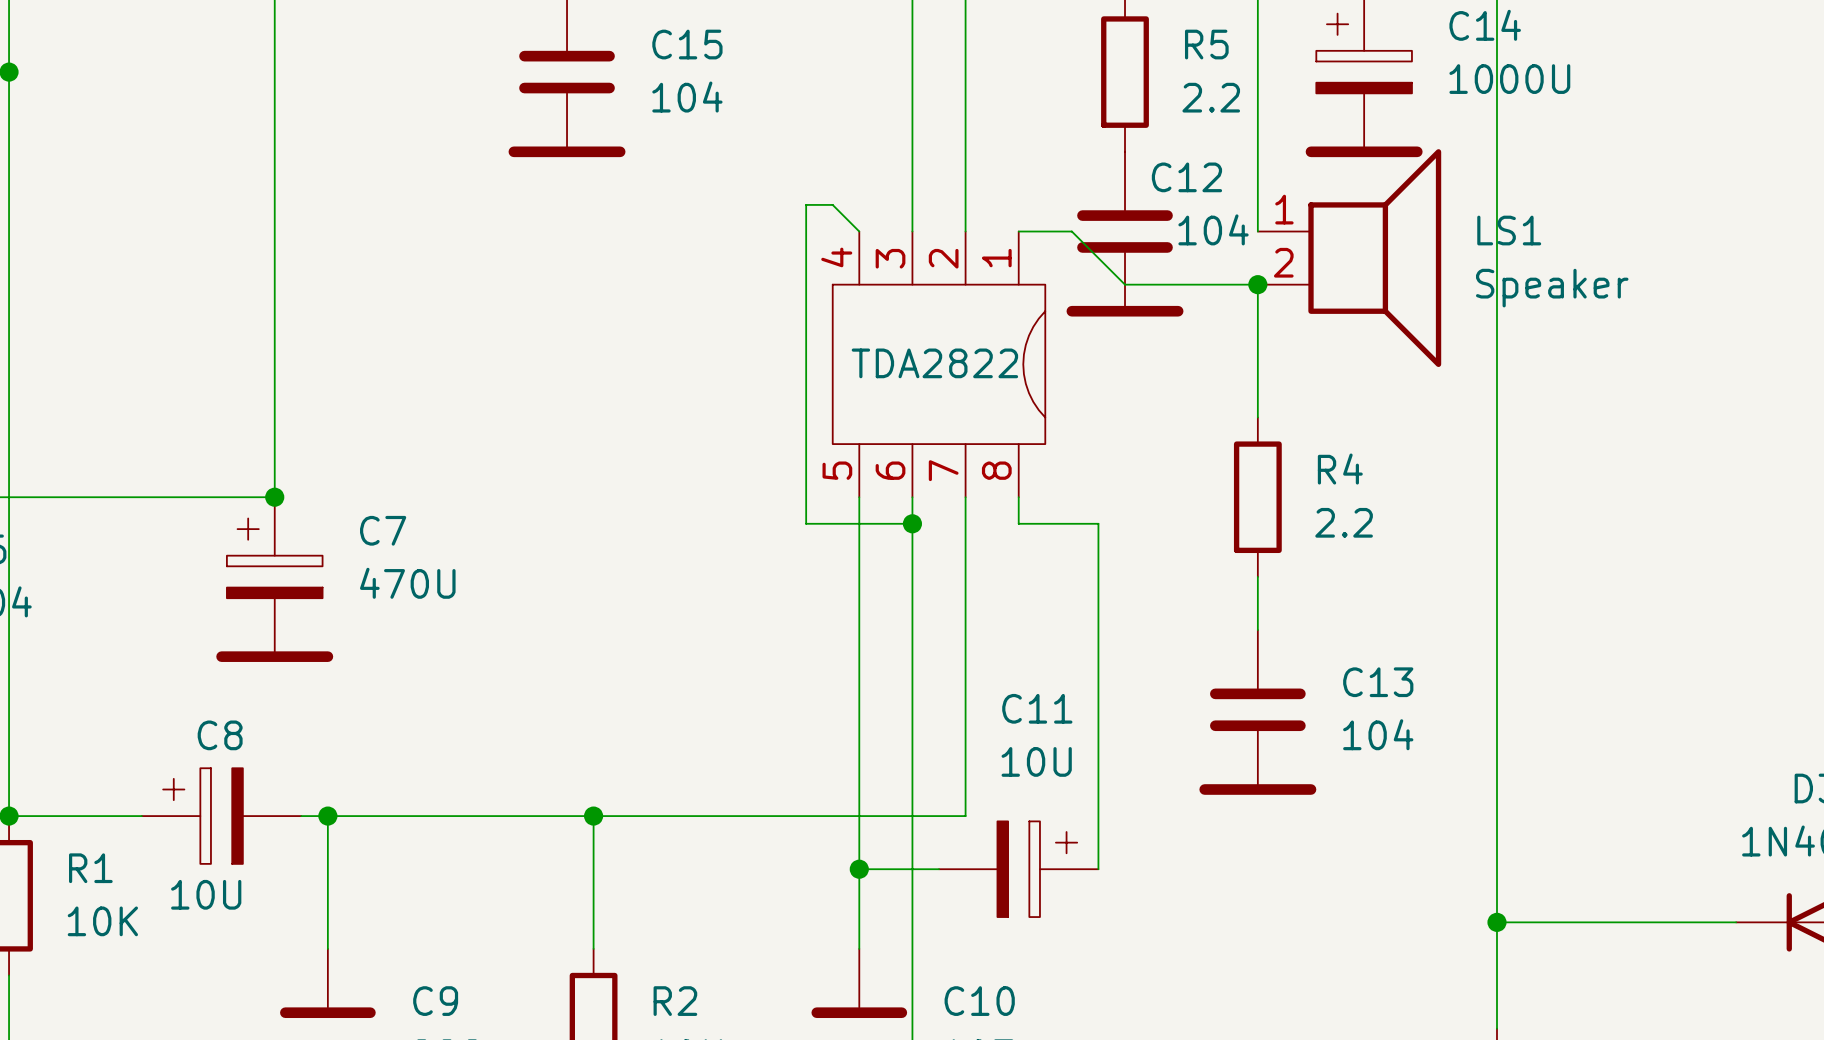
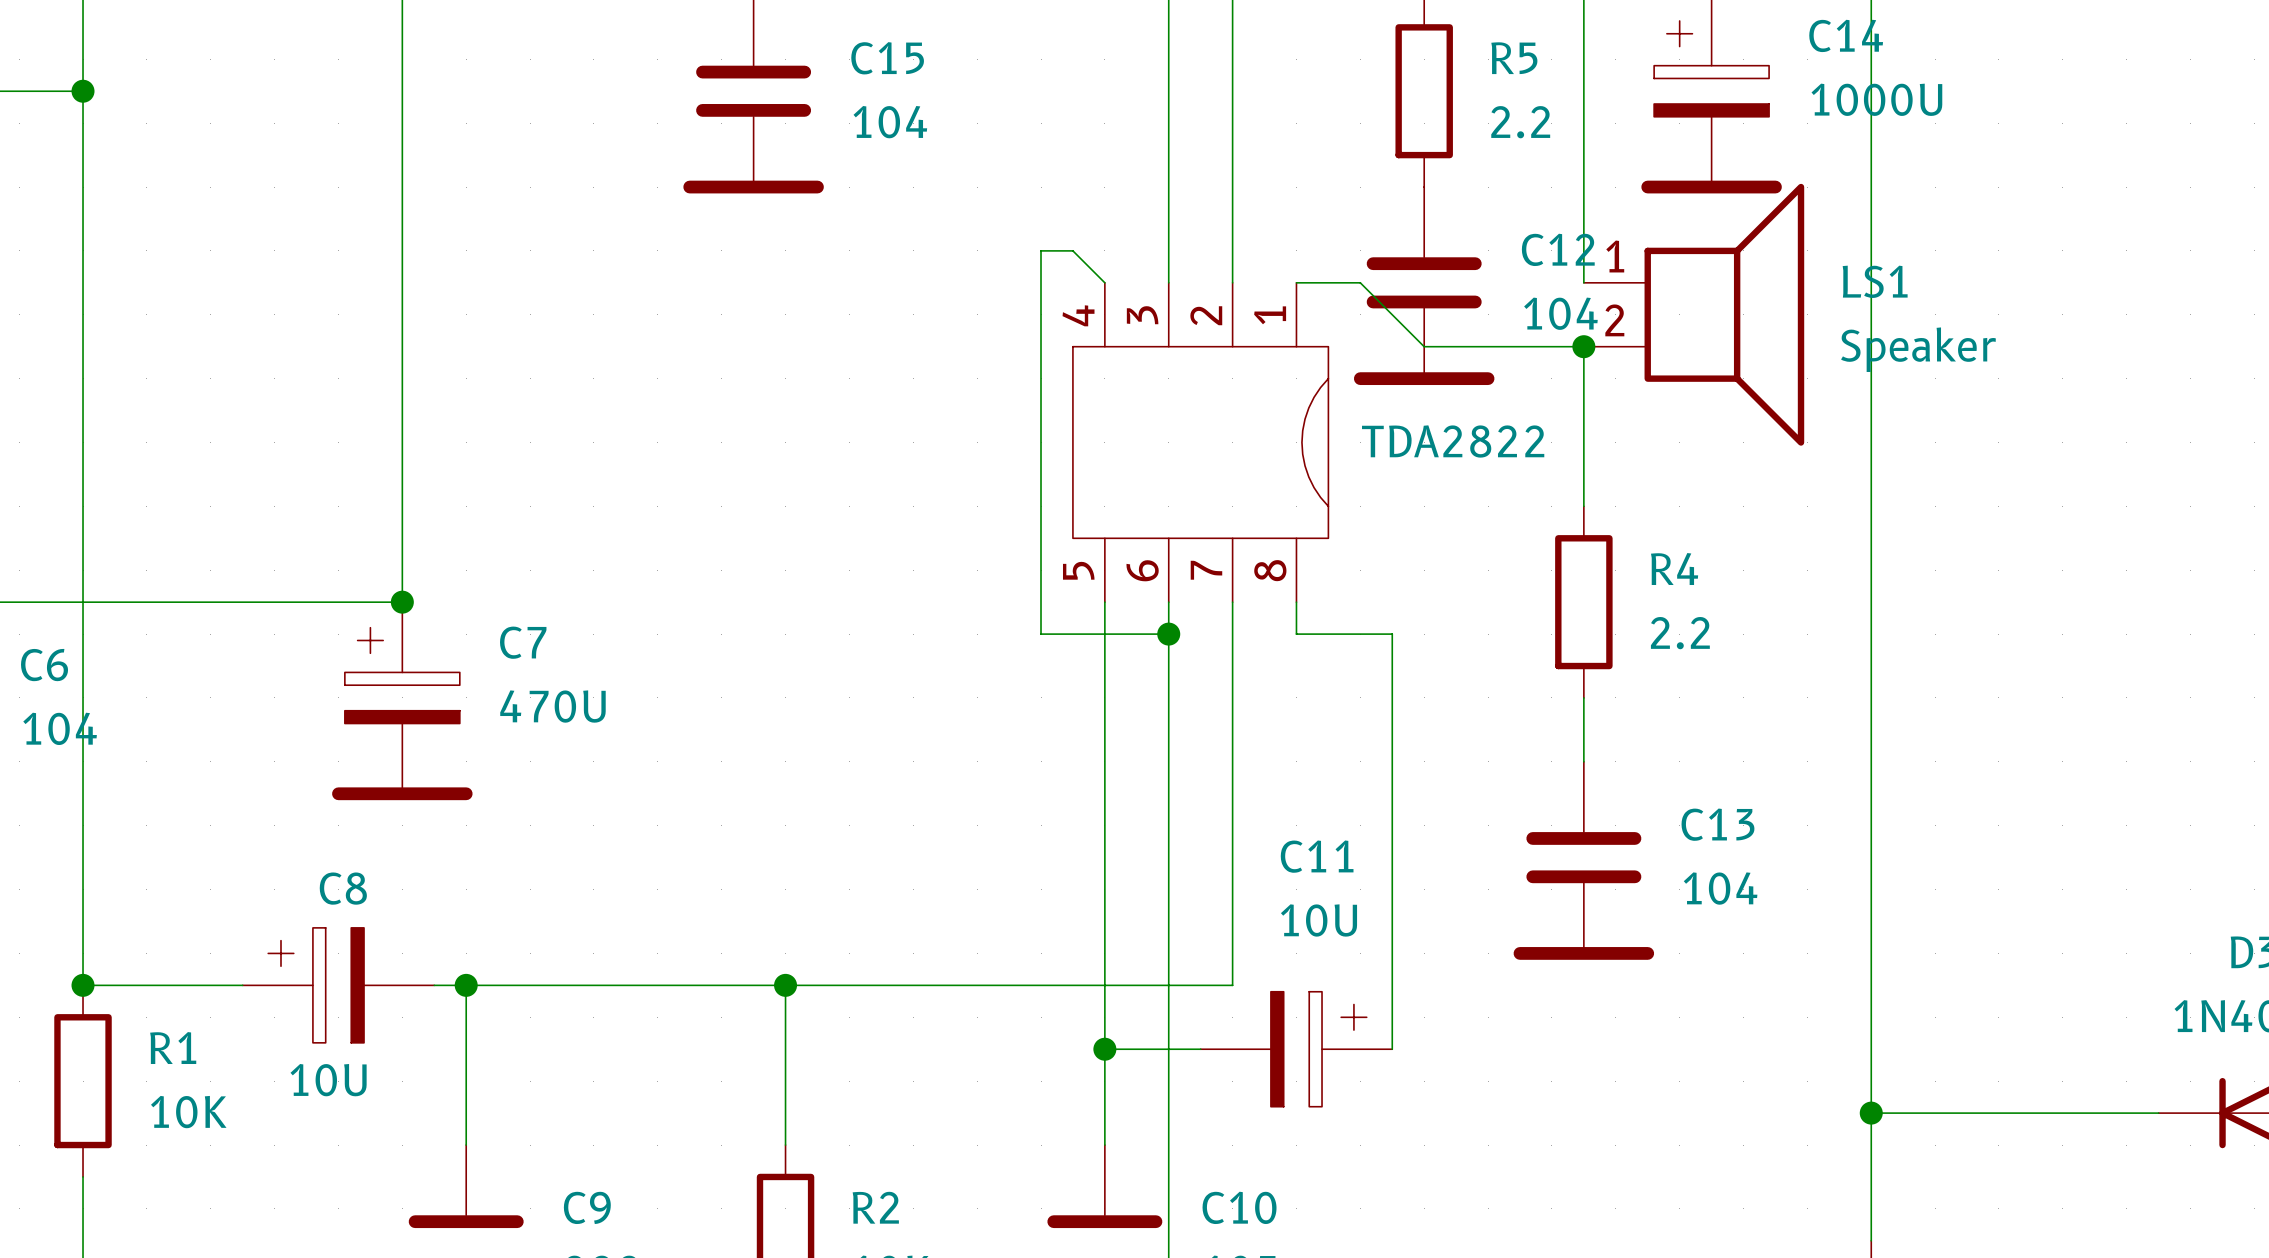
C12 name position: C12 (1186, 177) -> C12 (1558, 249)
C12 value position: 104 (1213, 229) -> 104 (1560, 313)
TDA2822 name position: TDA2822 (934, 363) -> TDA2822 (1453, 441)

